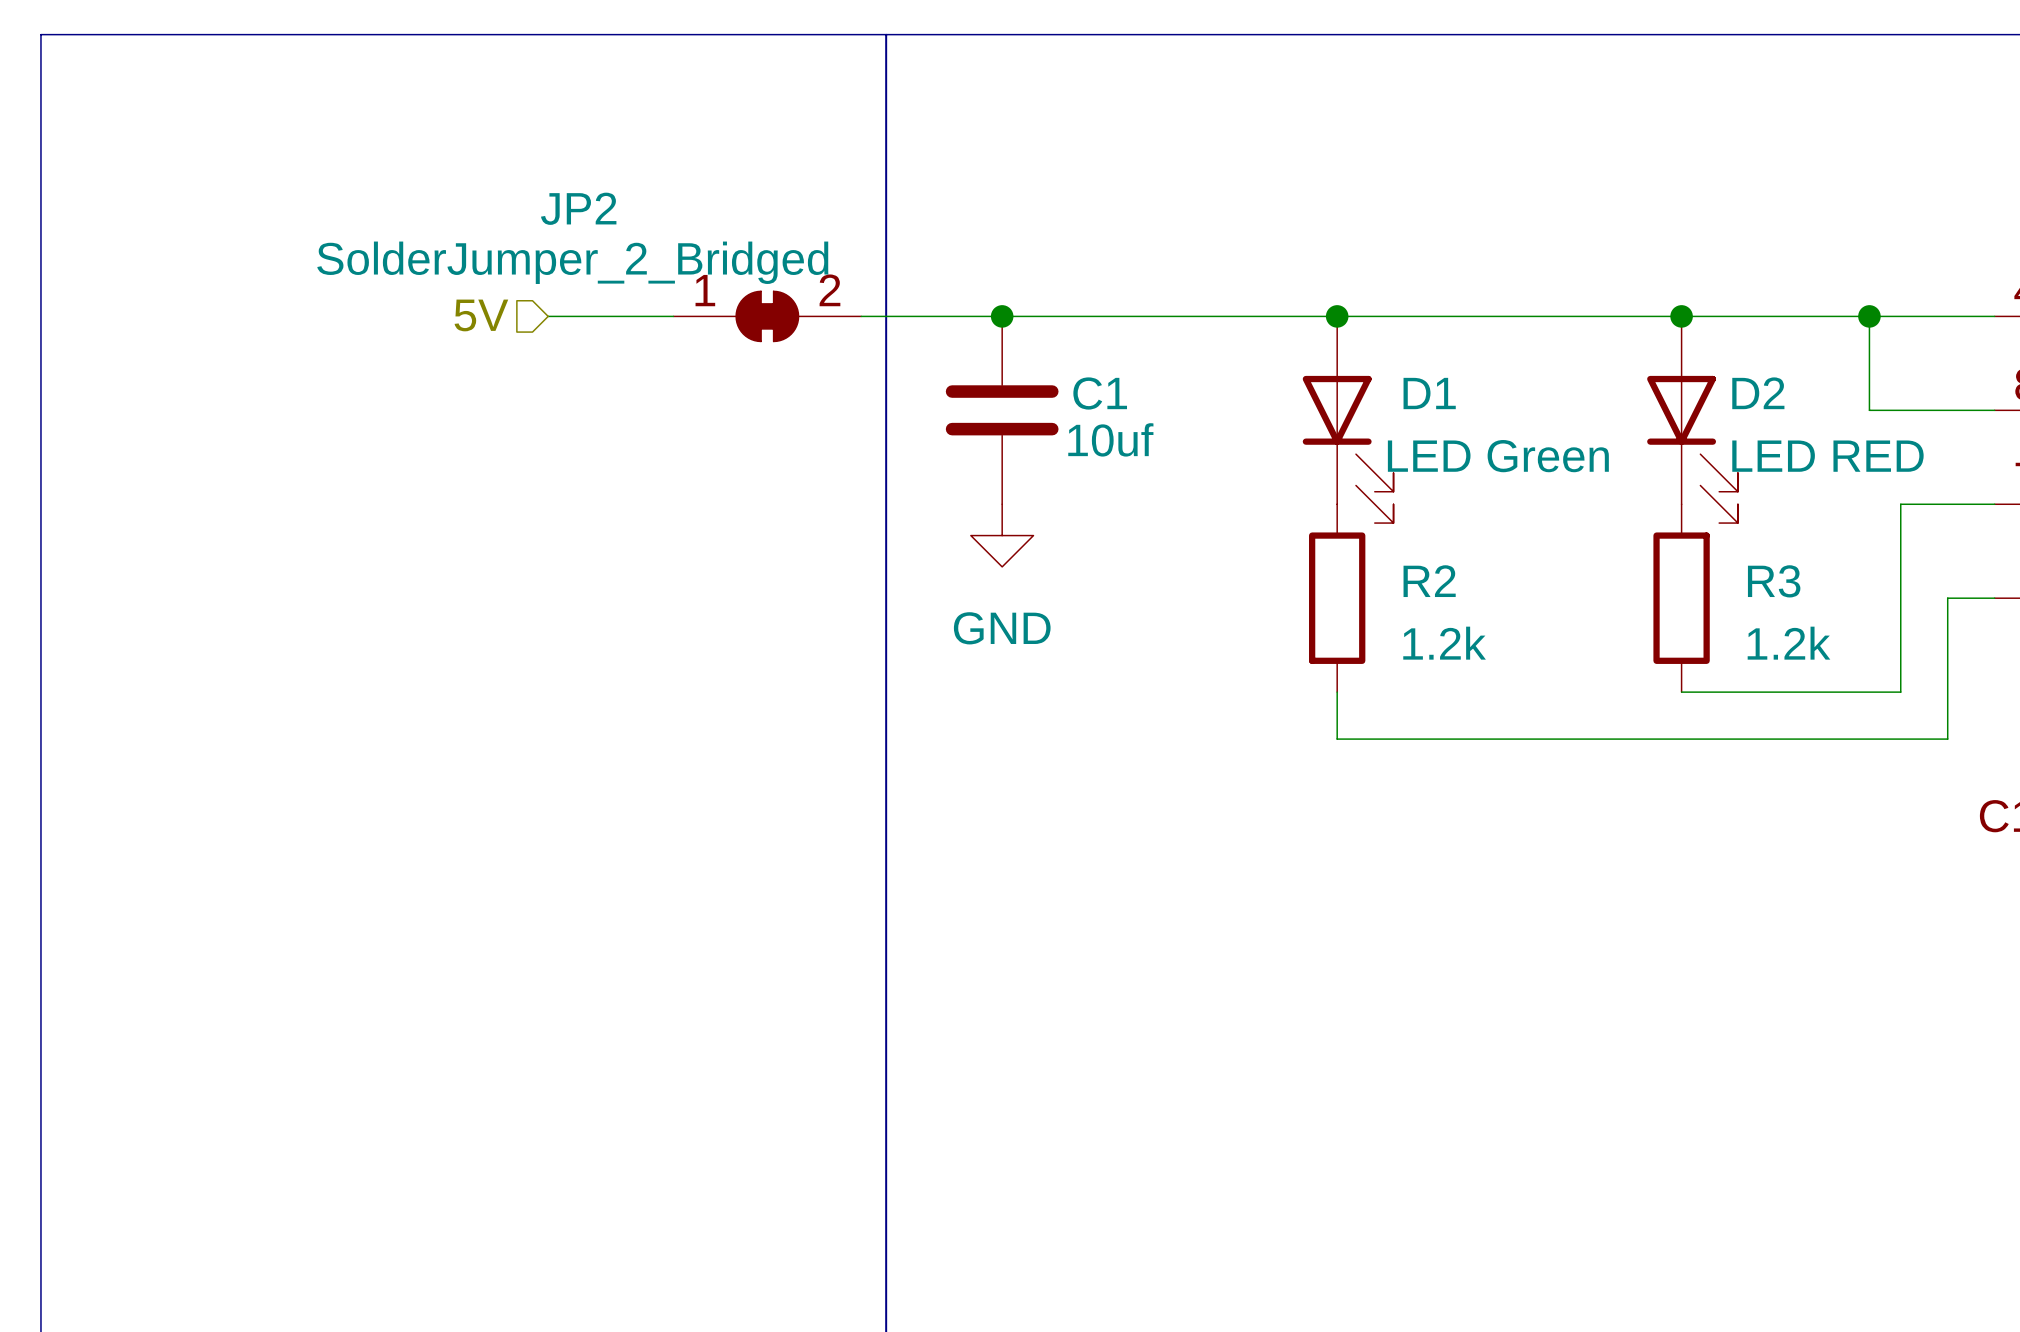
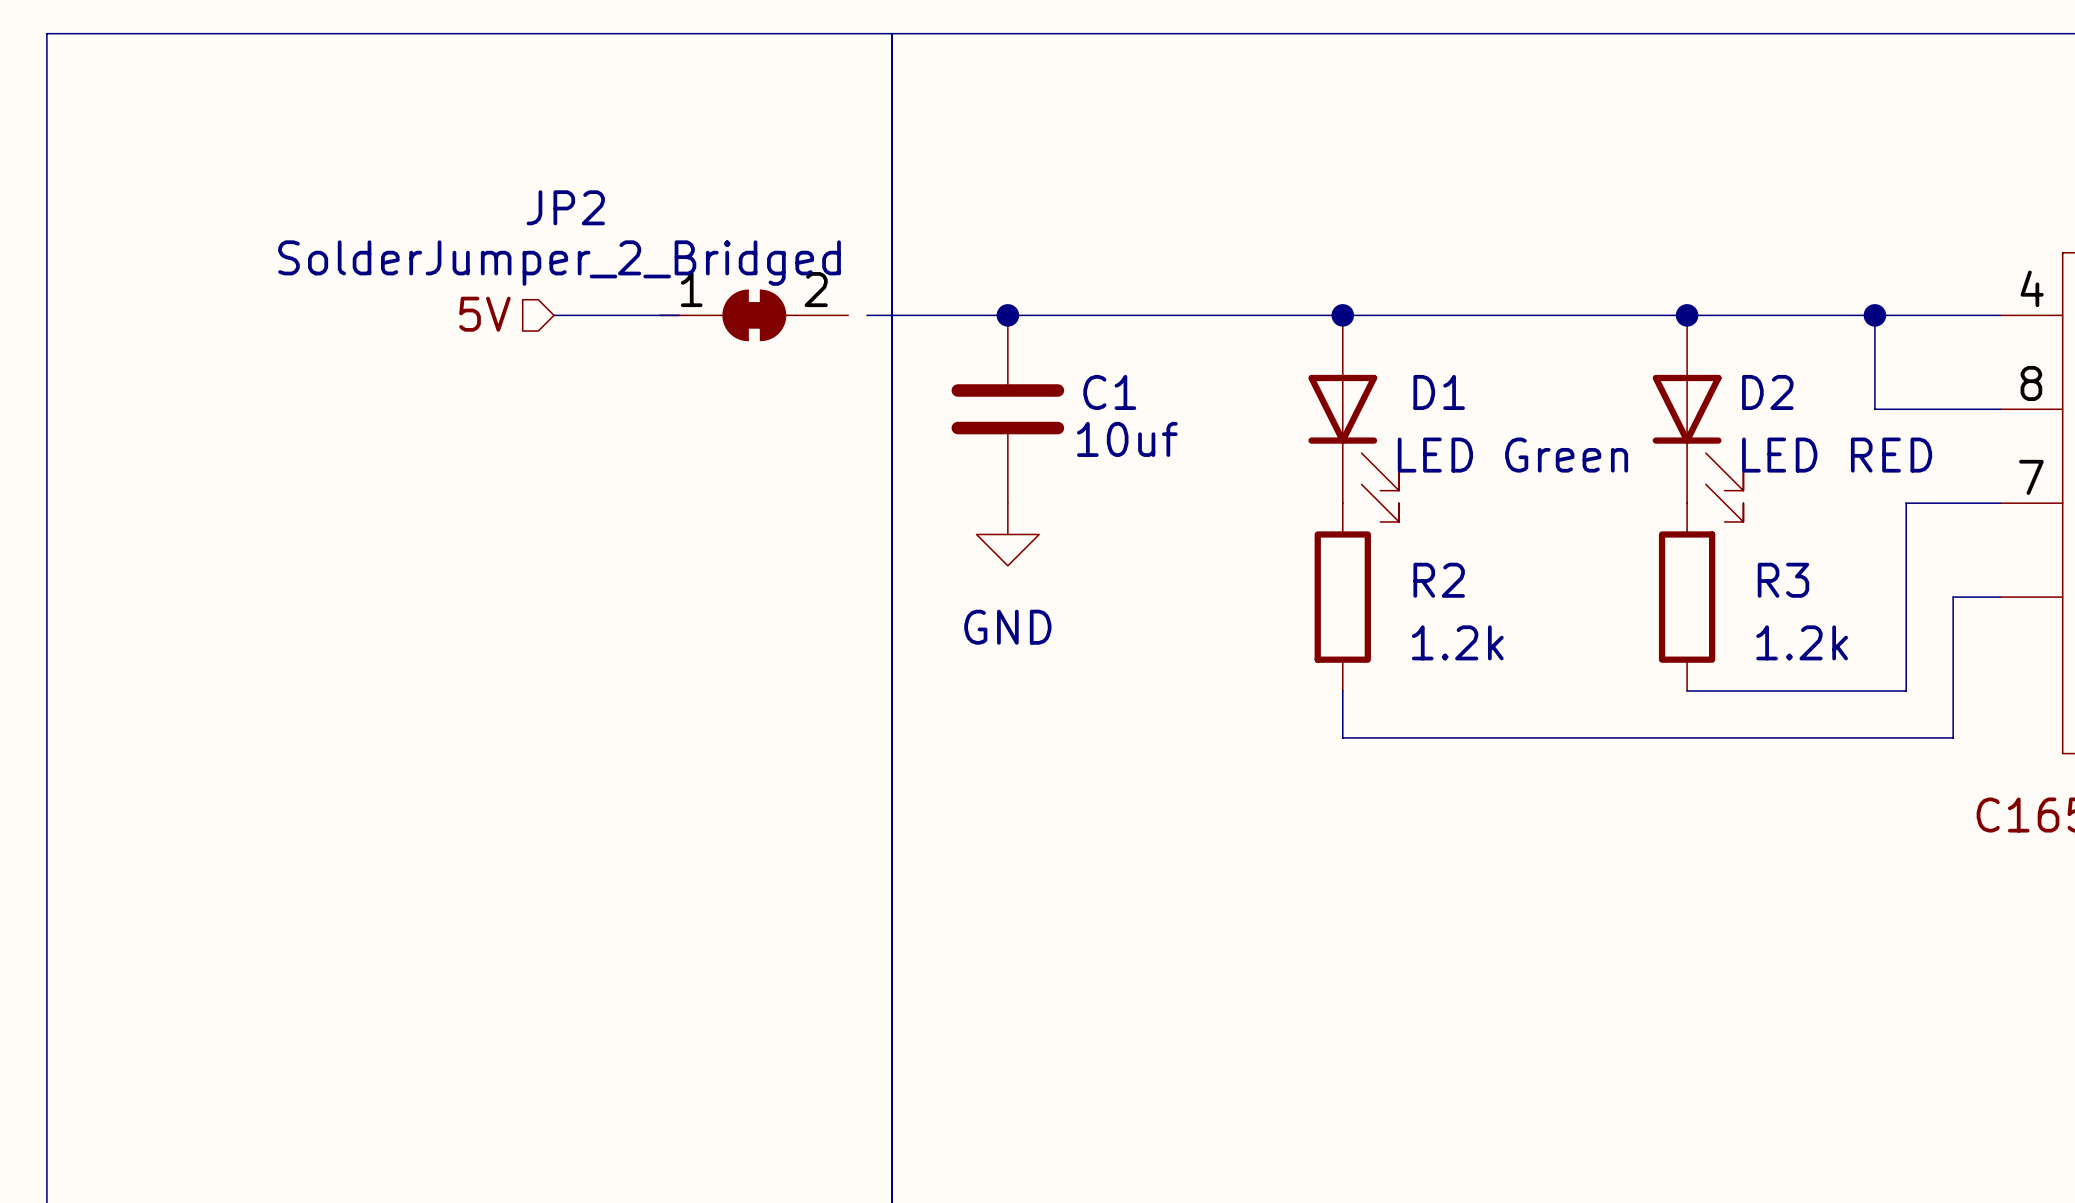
JP2 position: (767, 316) -> (754, 315)

